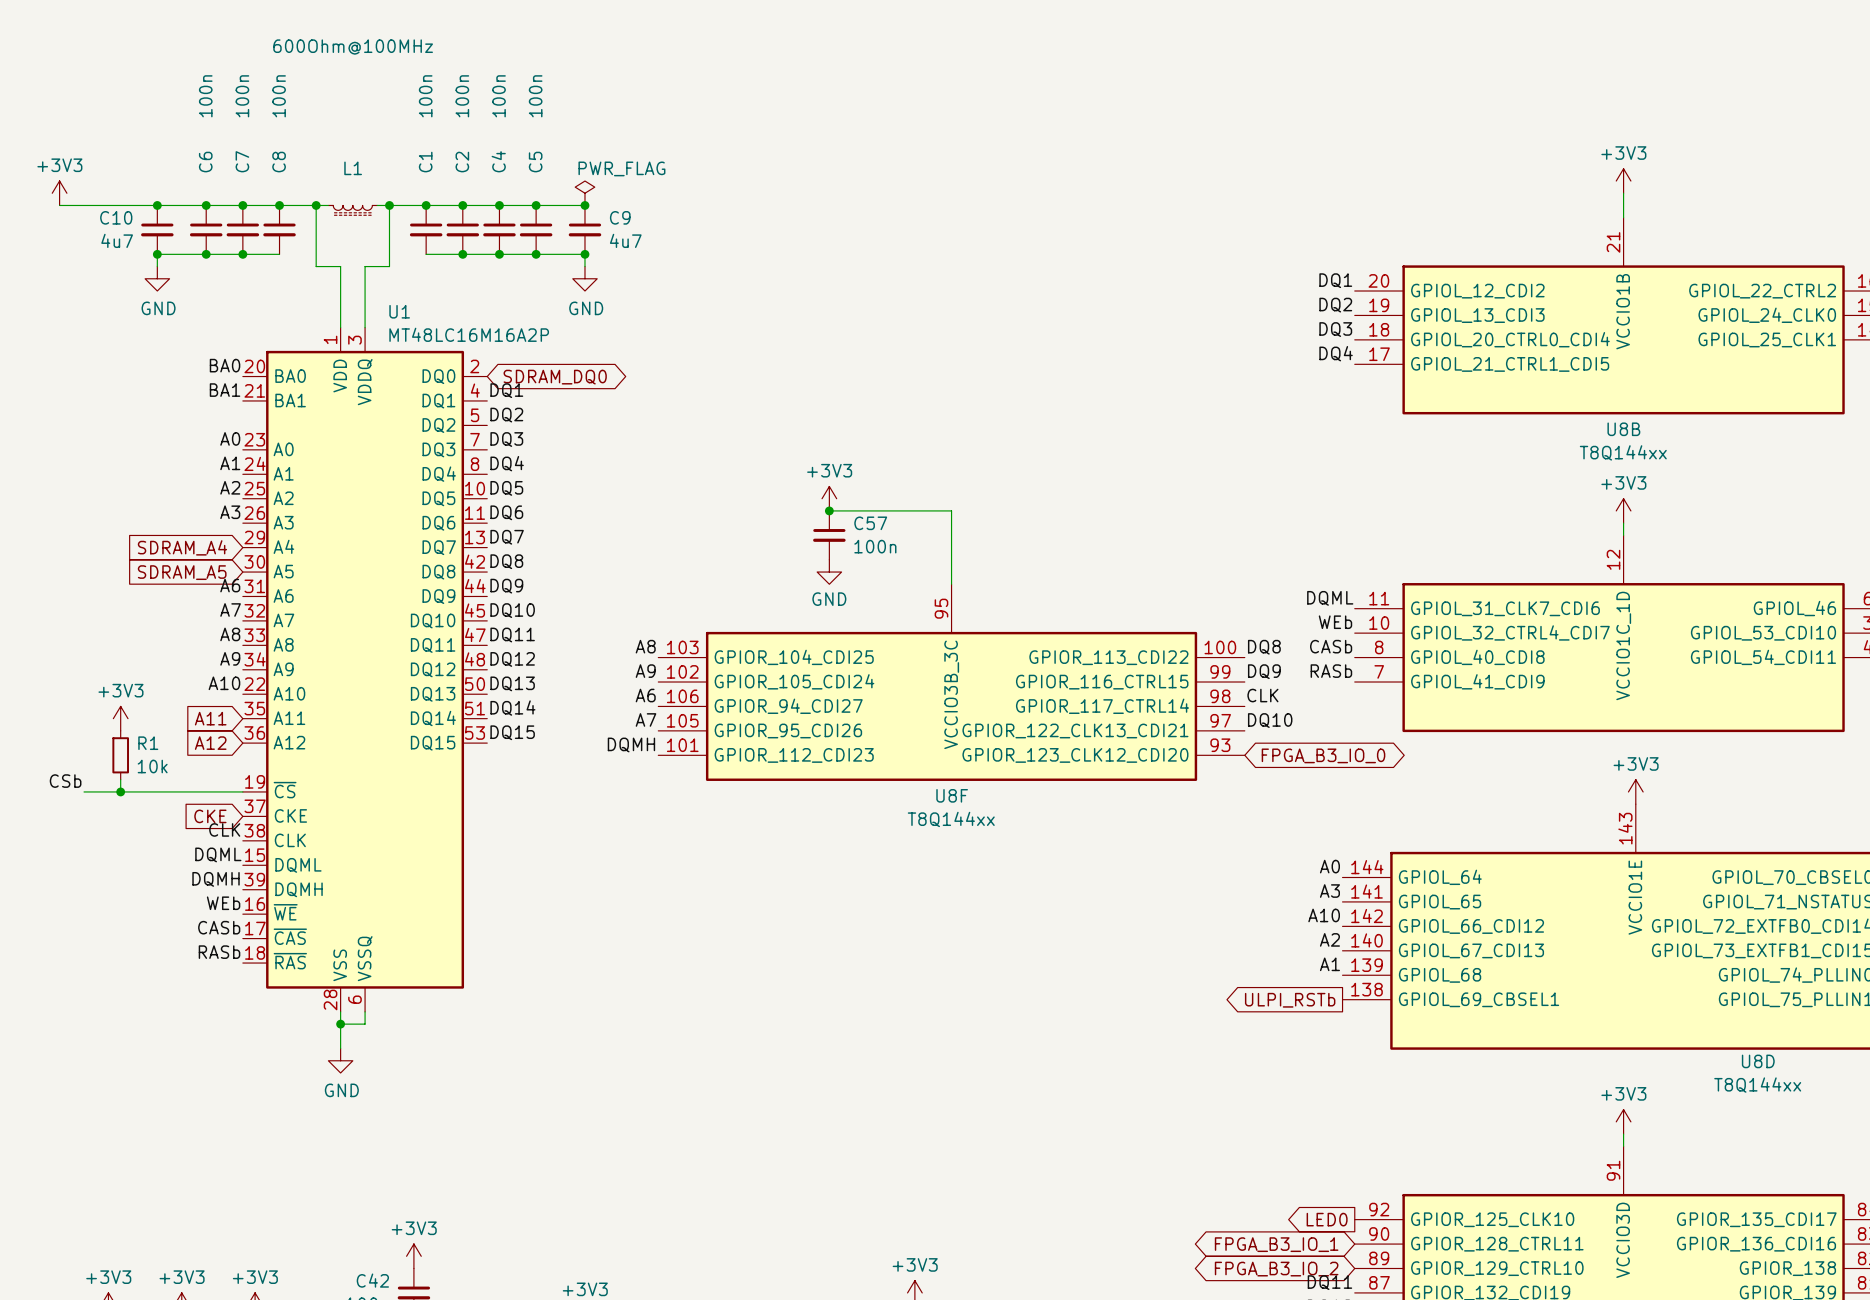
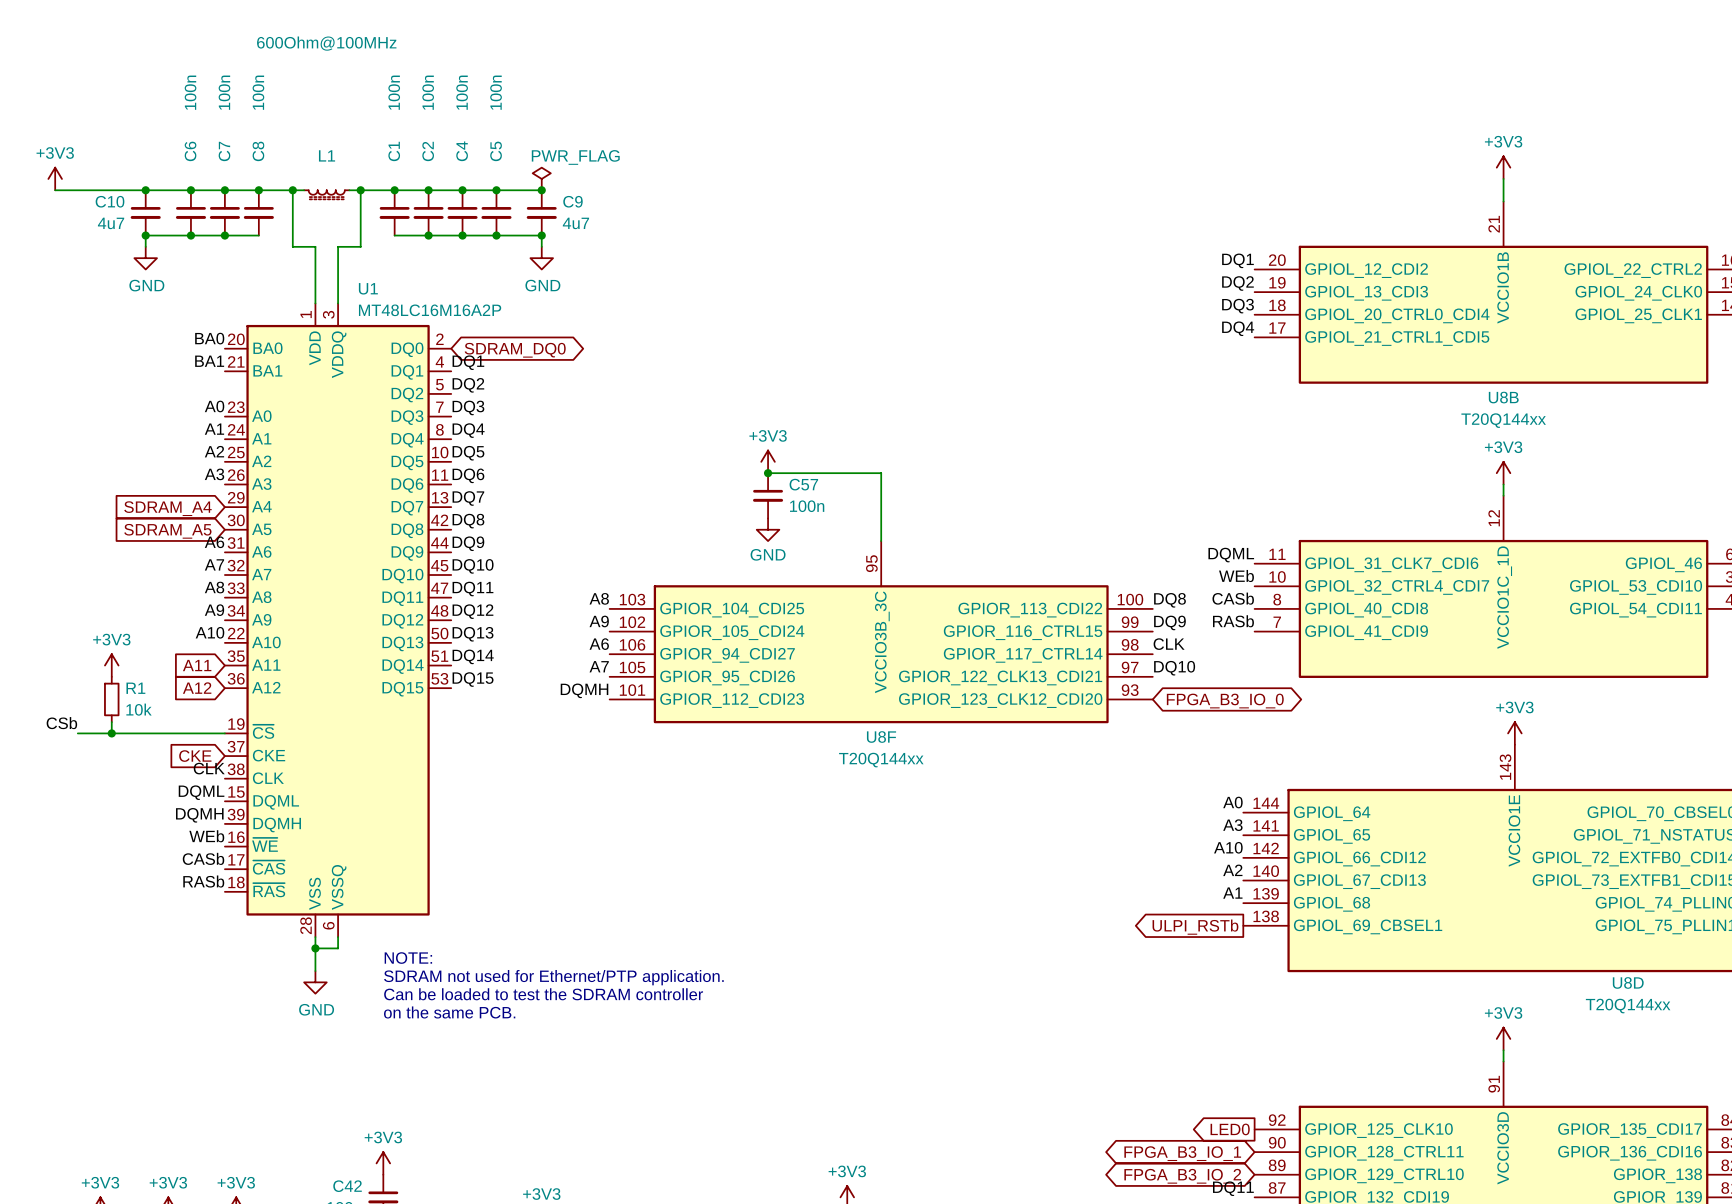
U8B value: T8Q144xx (1623, 452) -> T20Q144xx (1503, 420)
U8F value: T8Q144xx (951, 819) -> T20Q144xx (881, 760)
text: none -> NOTE: (408, 958)
text: none -> SDRAM not used for Ethernet/PTP application. (553, 977)
text: none -> Can be loaded to test the SDRAM controller (543, 994)
U8D value: T8Q144xx (1757, 1085) -> T20Q144xx (1628, 1006)
text: none -> on the same PCB. (449, 1012)

